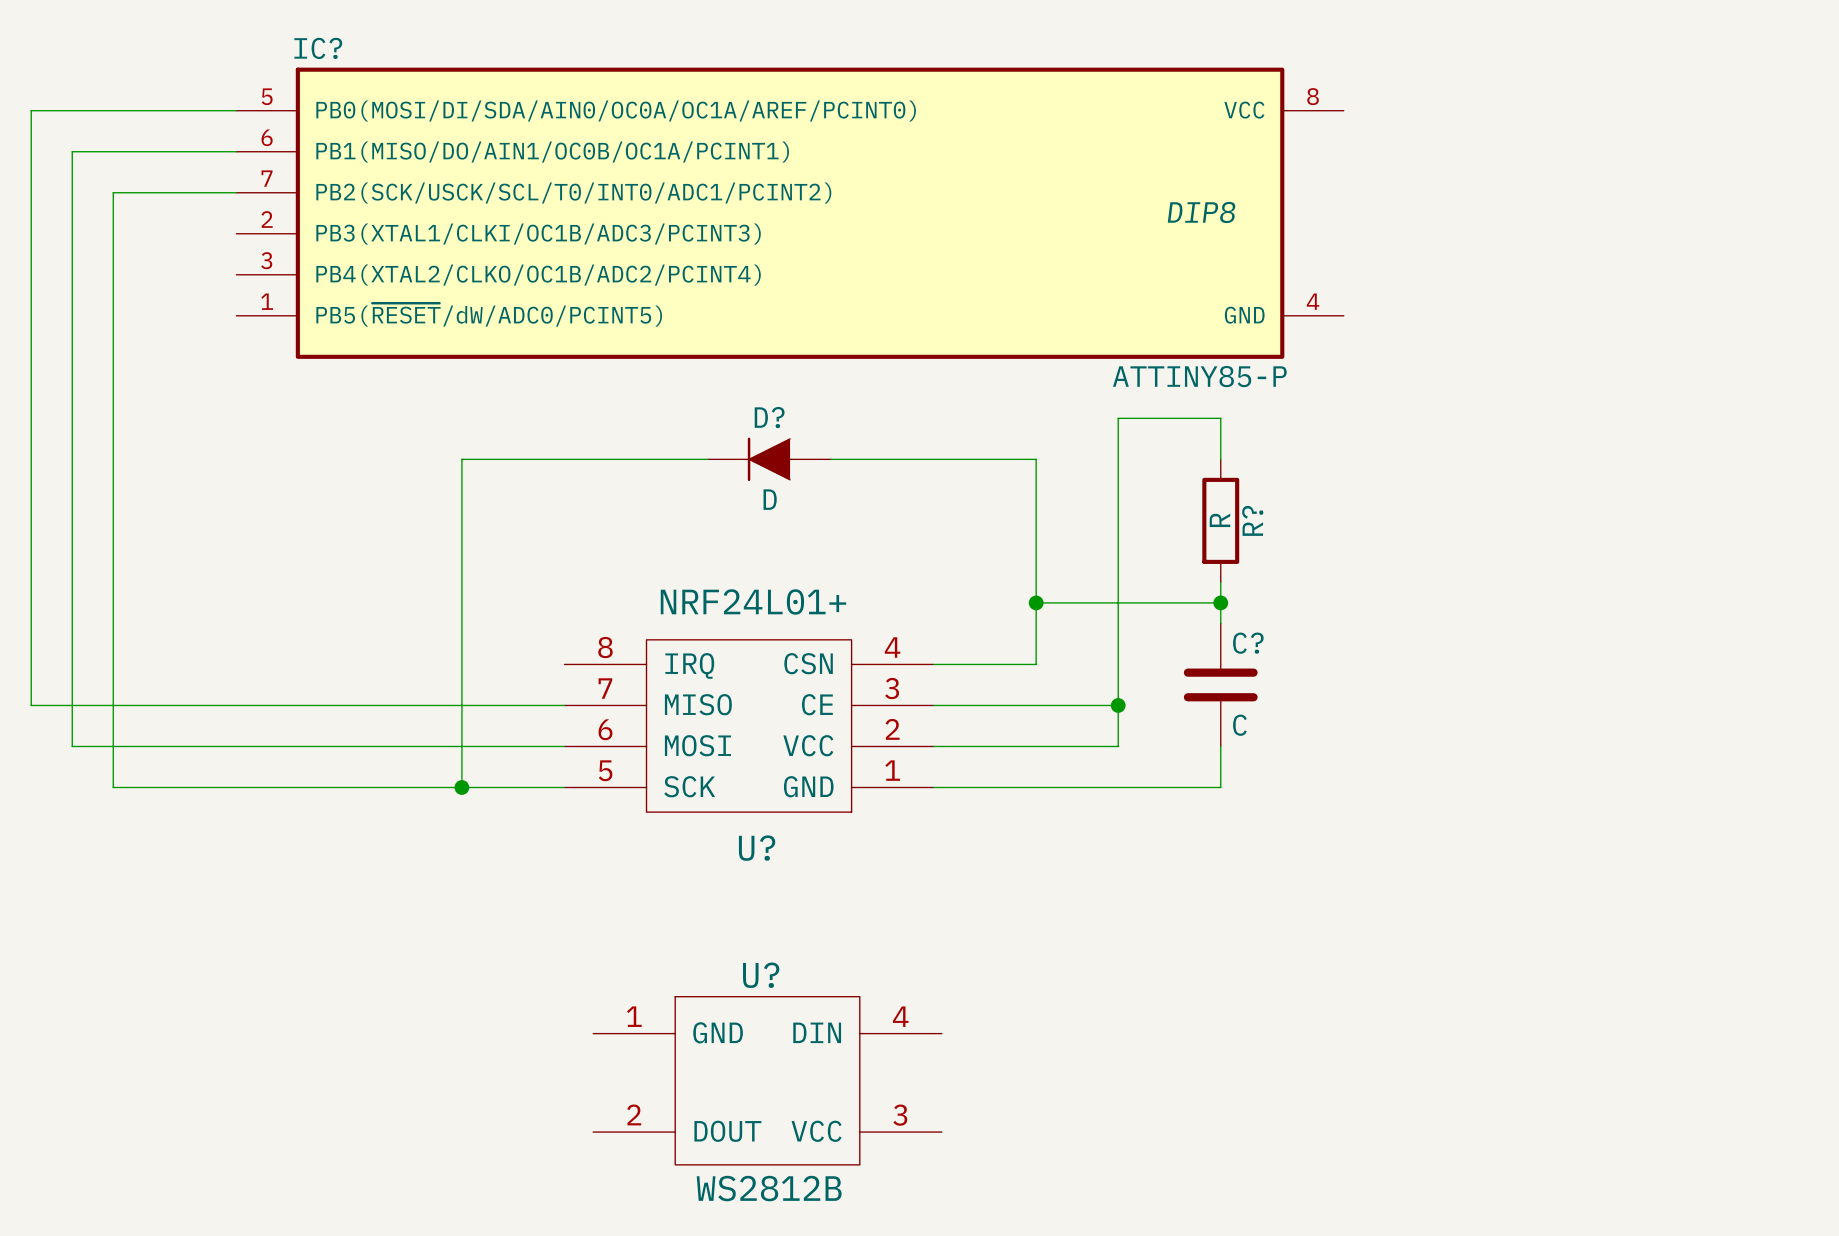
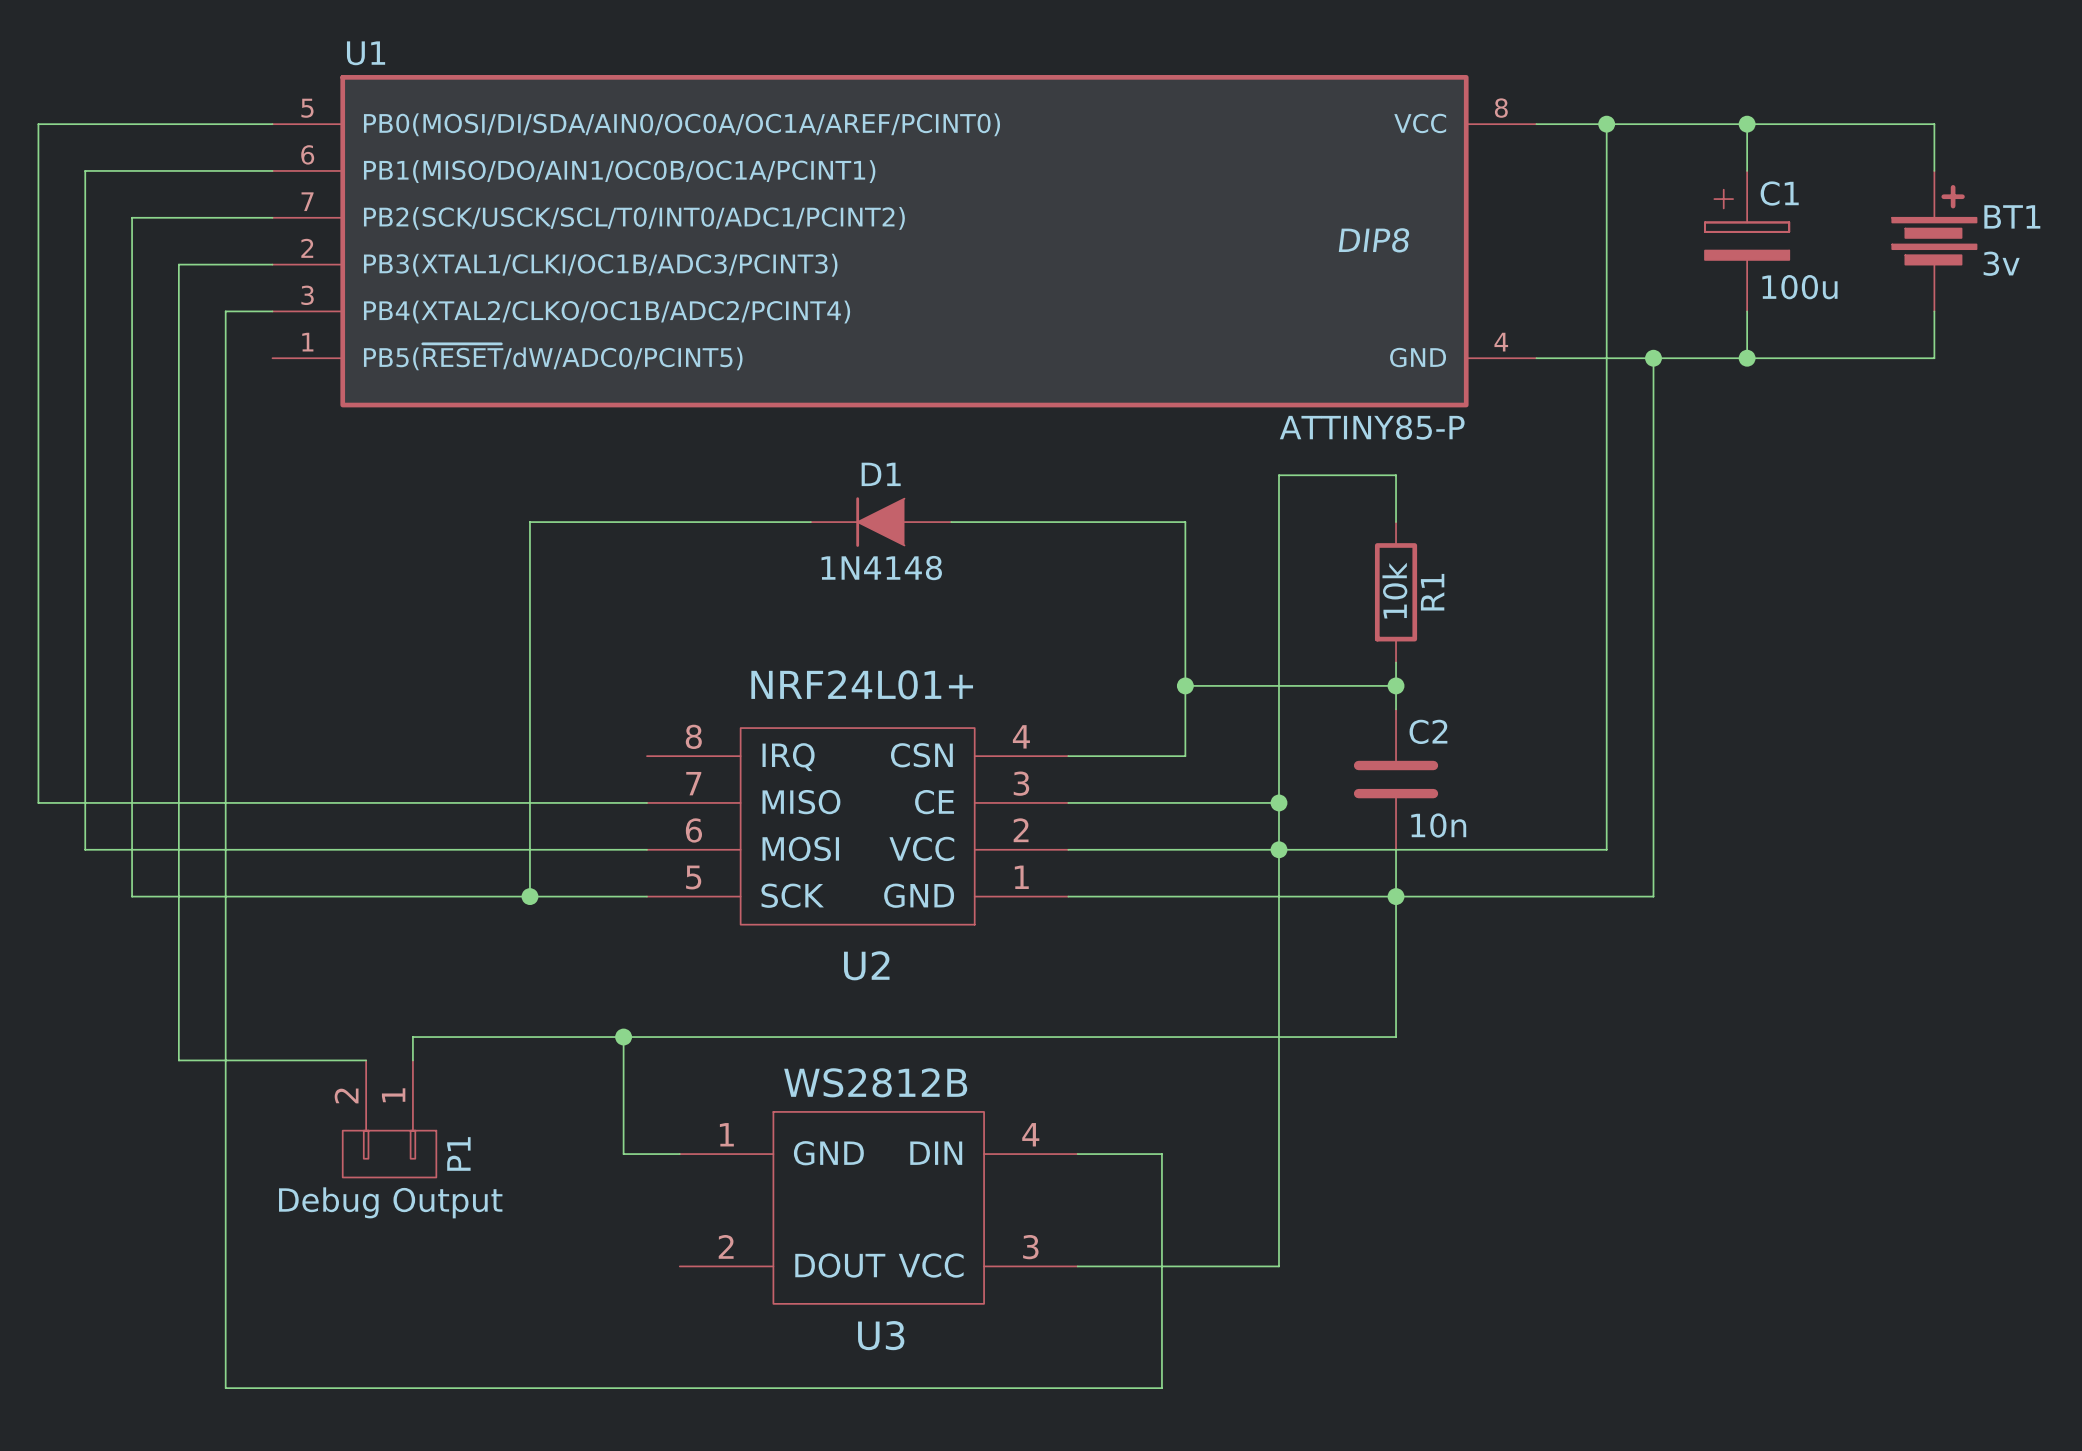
IC? name: IC? (318, 48) -> U1 (366, 53)
wire: none -> (1536, 124) (1934, 124) (1934, 170)
wire: none -> (1606, 124) (1606, 849) (1278, 849) (1278, 1266) (1077, 1266)
junction: none -> (1606, 124)
wire: none -> (1747, 124) (1747, 170)
junction: none -> (1747, 124)
C1: none -> 100u (1747, 241)
BT1: none -> 3v (1934, 241)
wire: none -> (272, 264) (178, 264) (178, 1060) (366, 1060)
wire: none -> (272, 311) (225, 311) (225, 1388) (1161, 1388) (1161, 1154) (1077, 1154)
wire: none -> (1747, 311) (1747, 358)
wire: none -> (1934, 311) (1934, 358) (1536, 358)
wire: none -> (1653, 358) (1653, 896) (1396, 896) (1396, 1037) (412, 1037) (412, 1060)
junction: none -> (1653, 358)
junction: none -> (1747, 358)
D? name: D? (769, 417) -> D1 (881, 474)
D? value: D (770, 499) -> 1N4148 (881, 568)
R? value: R (1219, 520) -> 10k (1394, 590)
R? name: R? (1252, 520) -> R1 (1432, 592)
C? name: C? (1248, 643) -> C2 (1428, 731)
C? value: C (1239, 725) -> 10n (1438, 825)
junction: none -> (1278, 849)
junction: none -> (1396, 896)
U? name: U? (757, 848) -> U2 (866, 965)
wire: none -> (623, 1037) (623, 1154) (679, 1154)
junction: none -> (623, 1037)
P1: none -> Debug Output (389, 1118)
U3: none -> WS2812B (878, 1207)
U?: WS2812B (767, 1080) -> none

